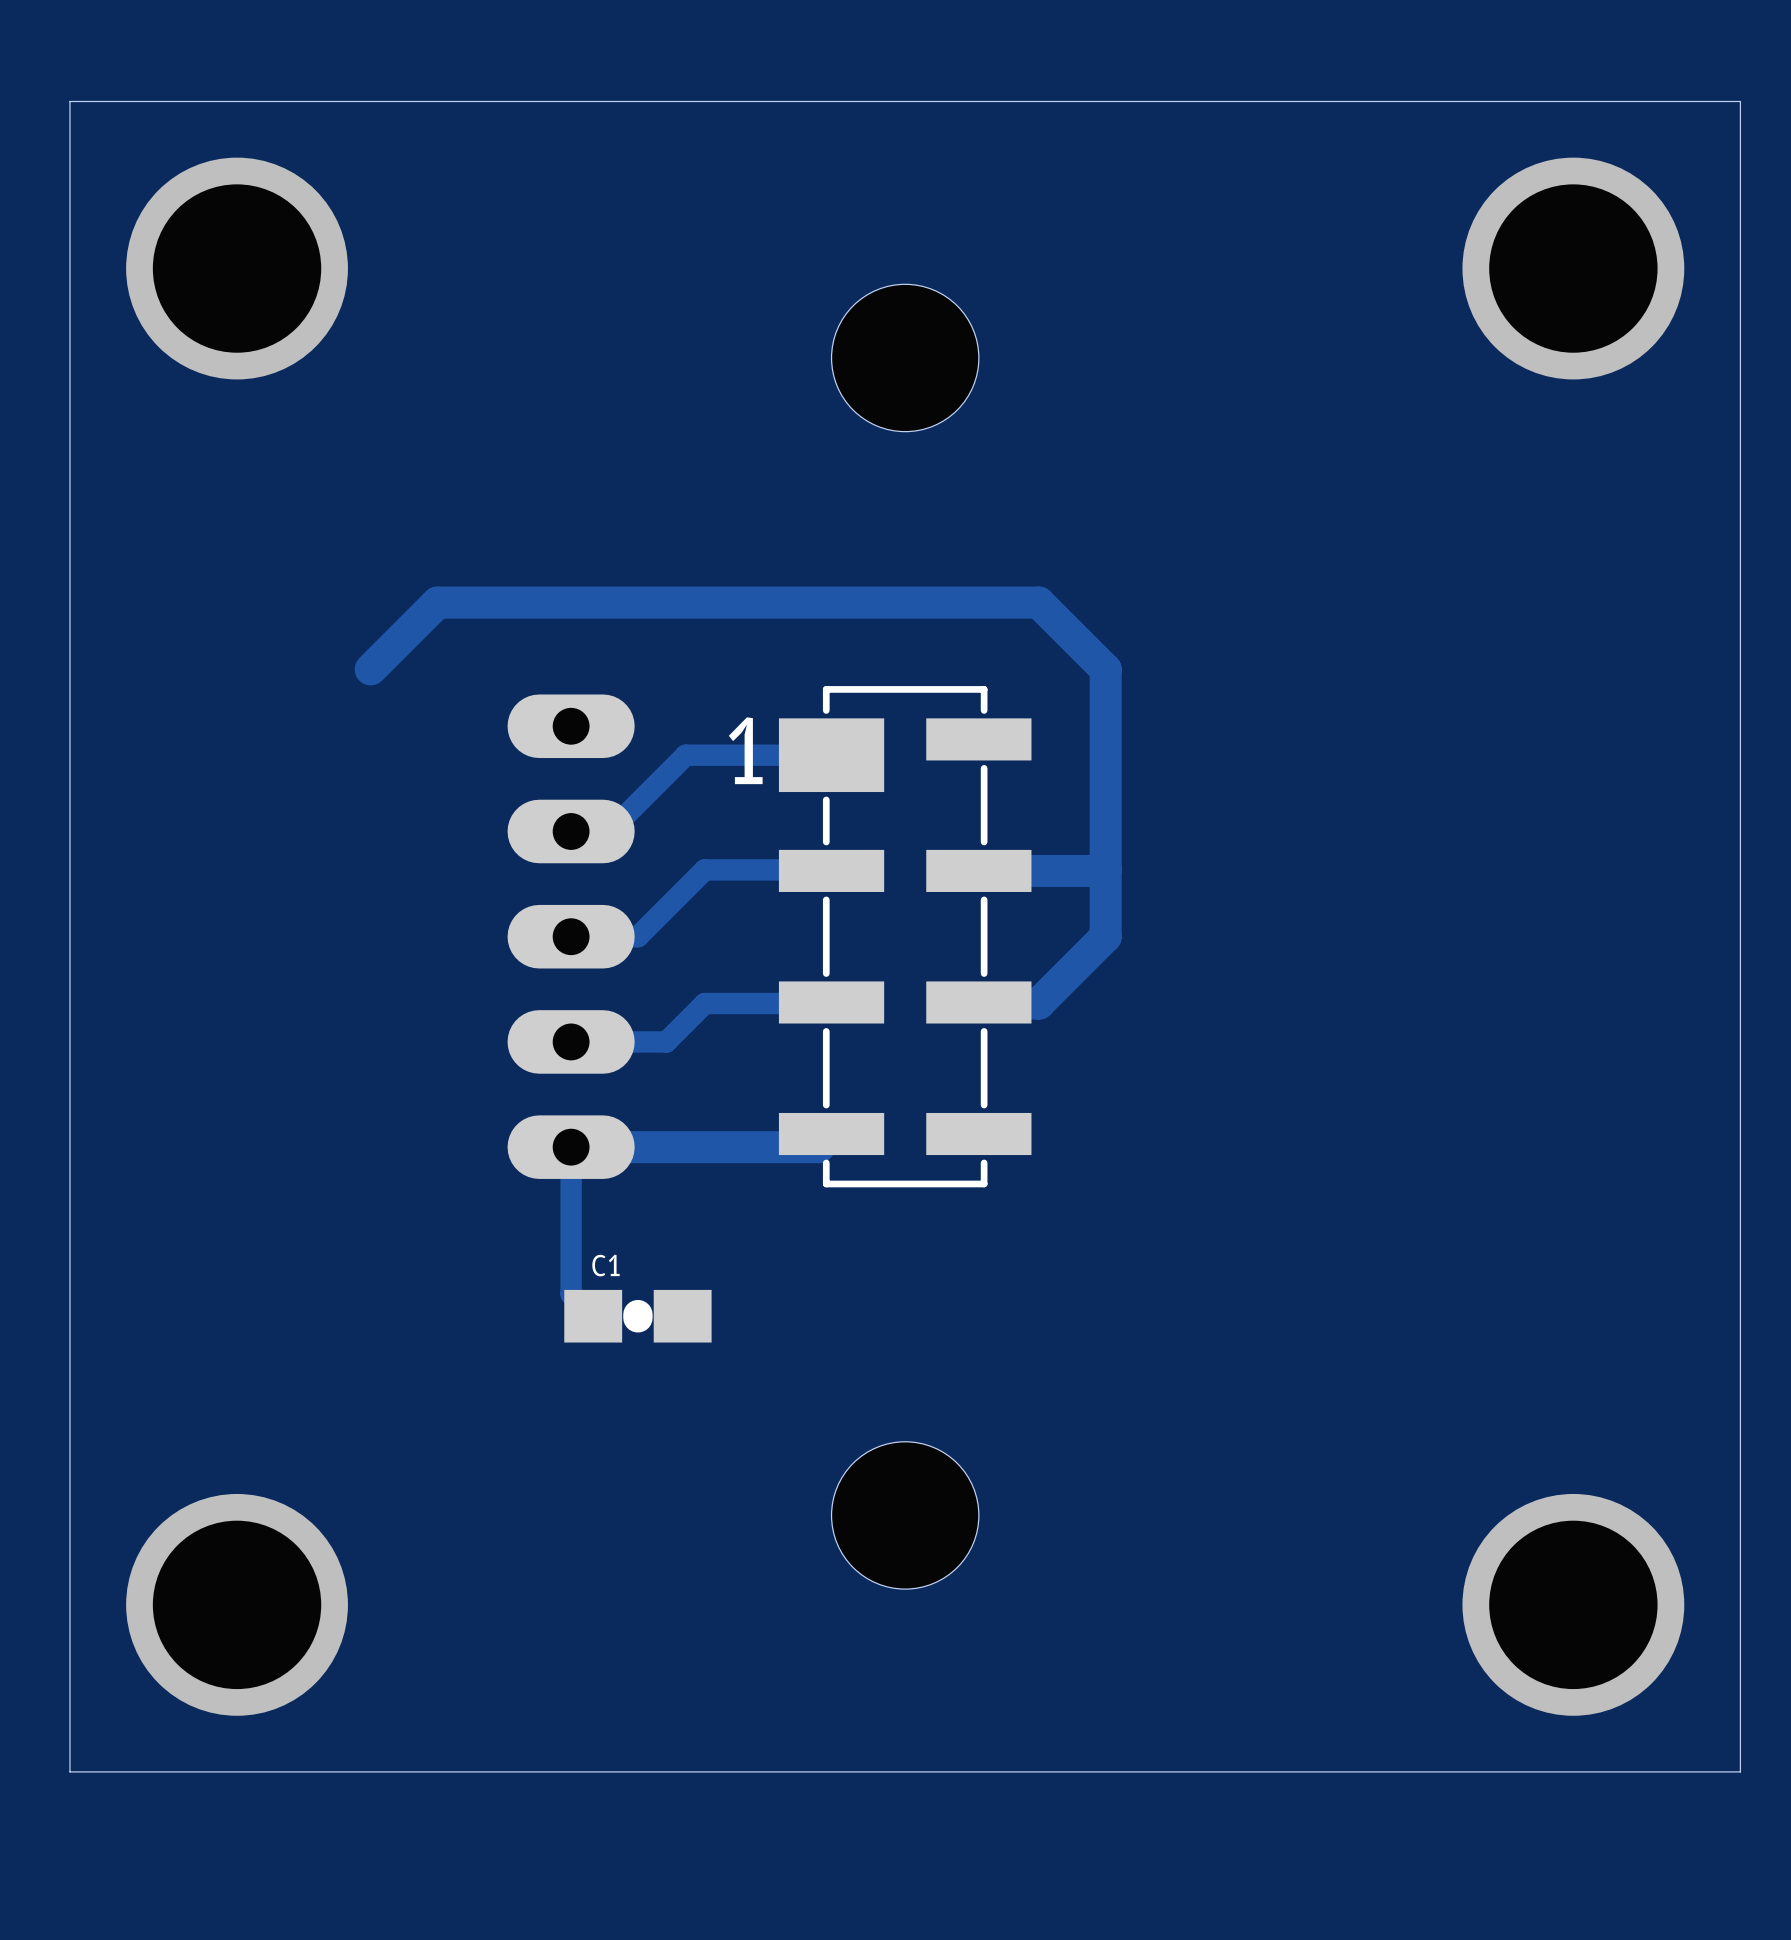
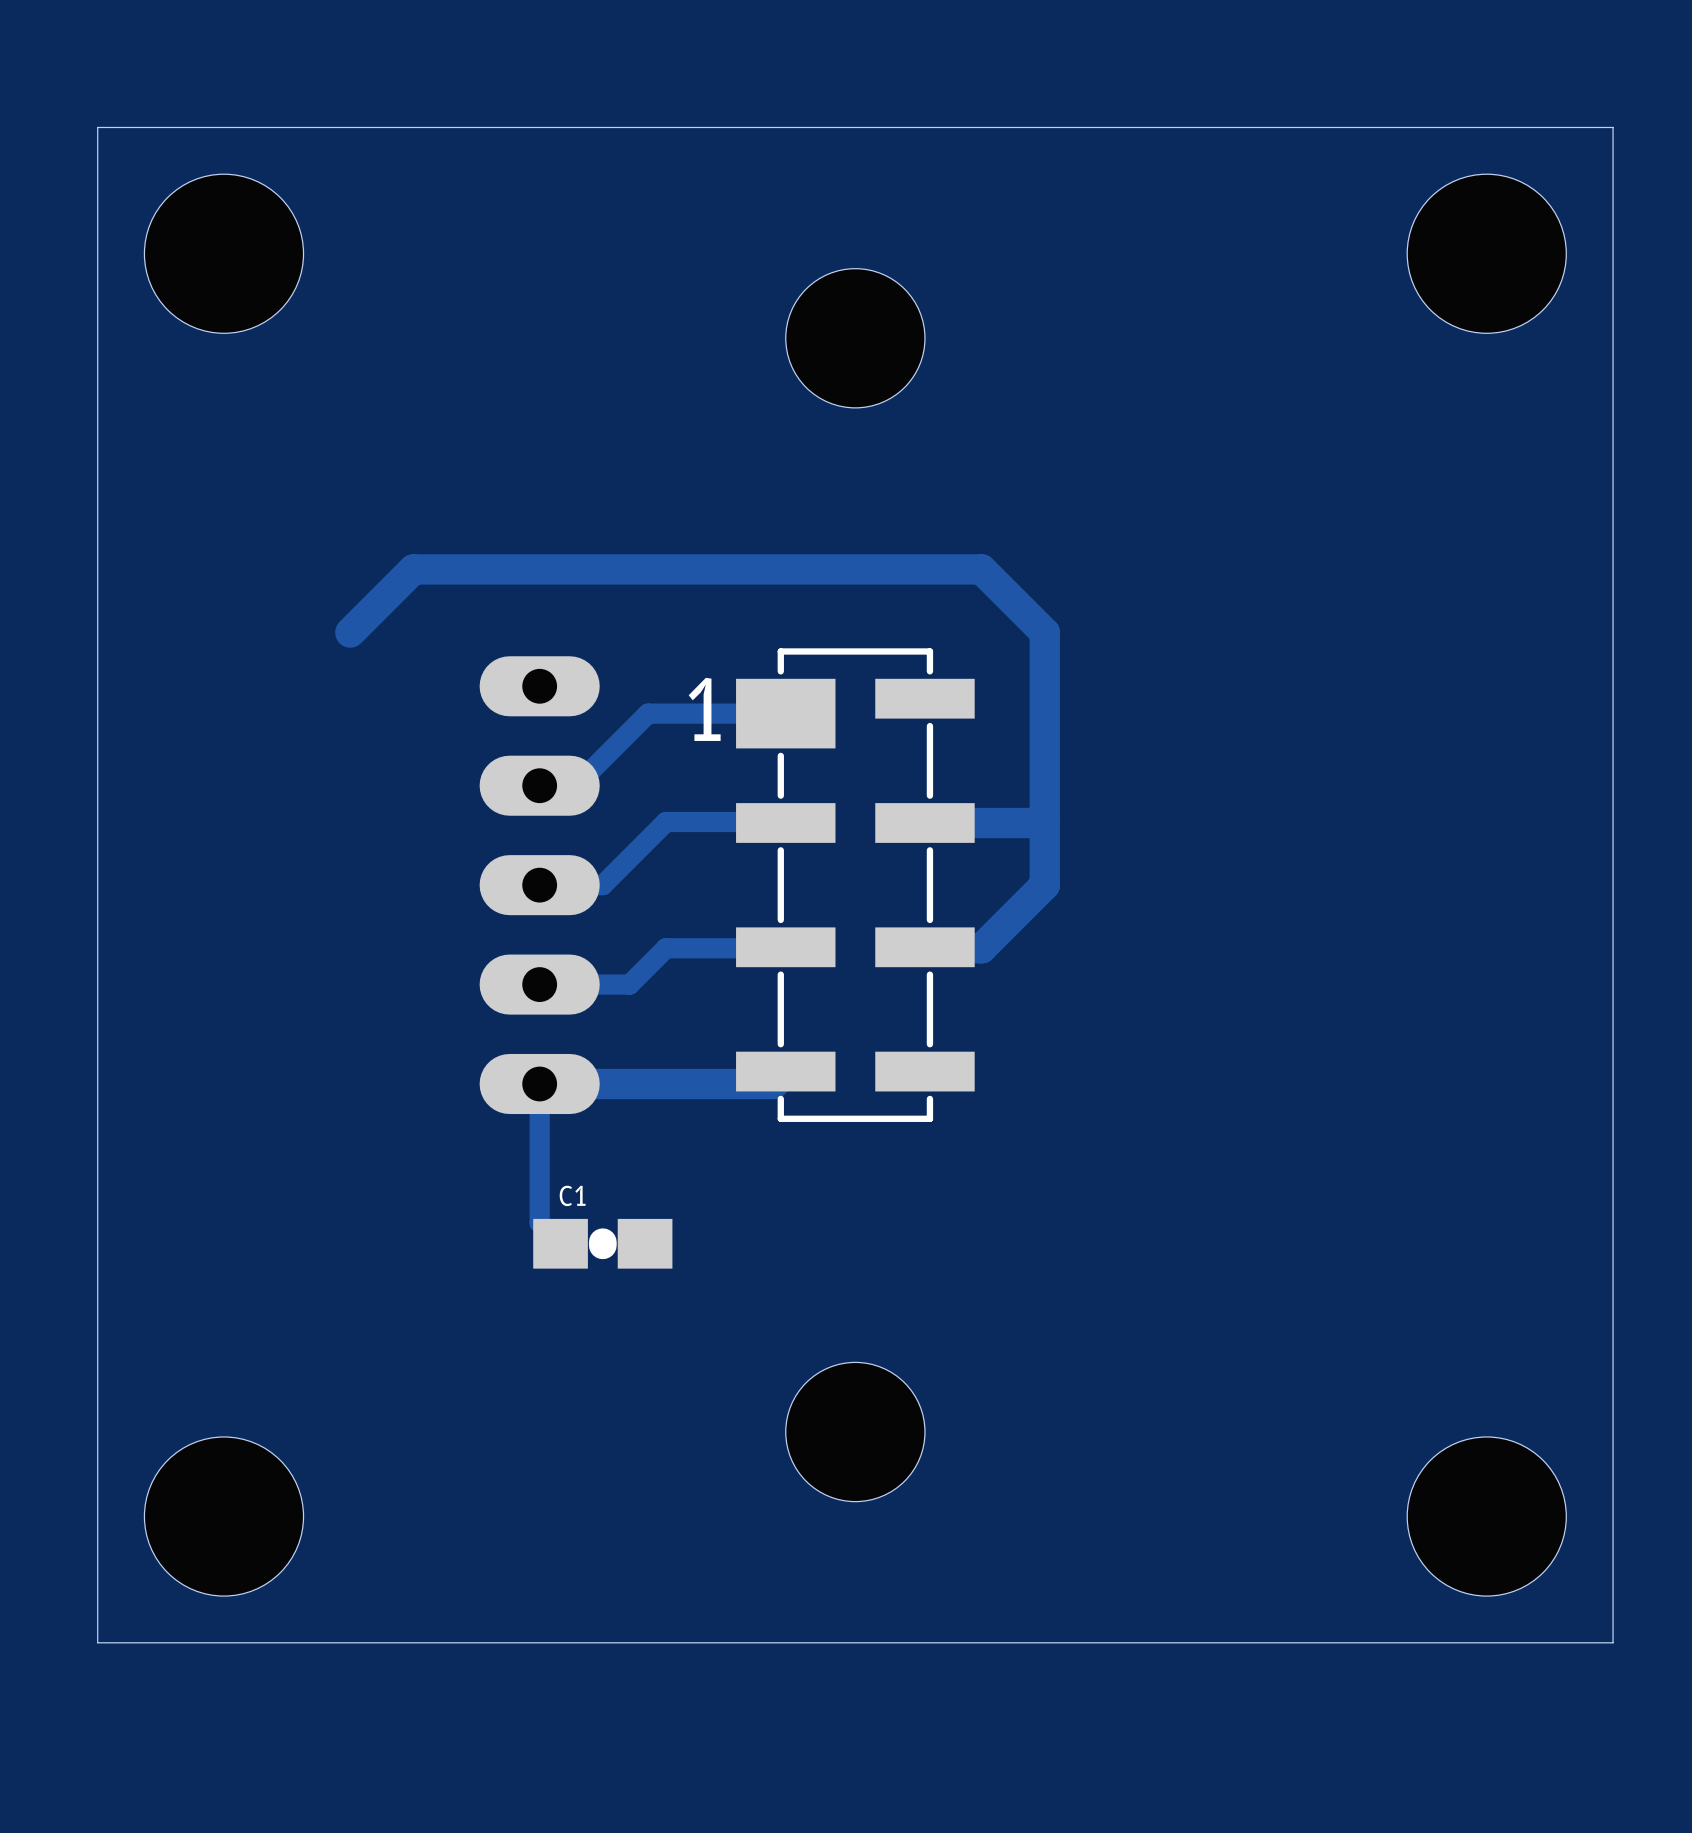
board edge: (69, 101) (1740, 101) (1740, 1771) (69, 1771) (69, 101) -> (97, 127) (97, 1642) (1613, 1642) (1613, 127) (97, 127)
via: (237, 268) -> none
hole: none -> (223, 253)
via: (1573, 268) -> none
hole: none -> (1486, 253)
via: (237, 1604) -> none
hole: none -> (223, 1516)
via: (1573, 1604) -> none
hole: none -> (1486, 1516)

